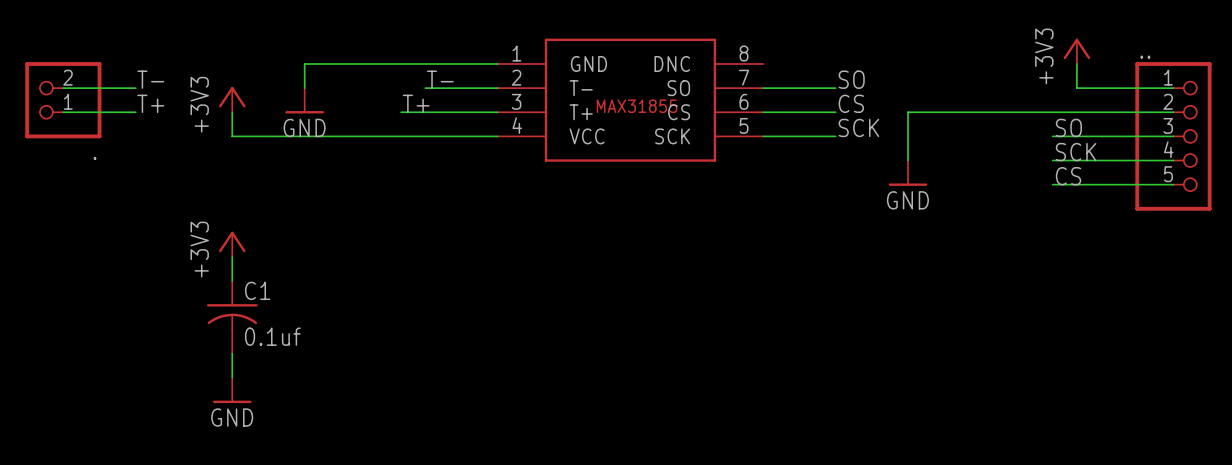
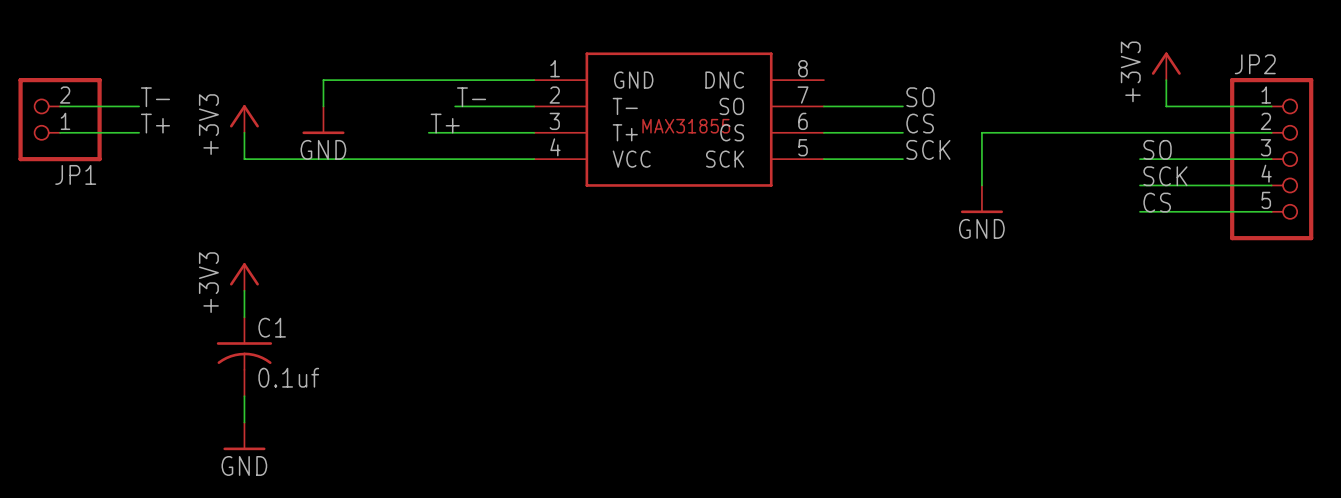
JP2 name: .. (1145, 57) -> JP2 (1255, 64)
JP1 name: . (95, 158) -> JP1 (75, 174)

